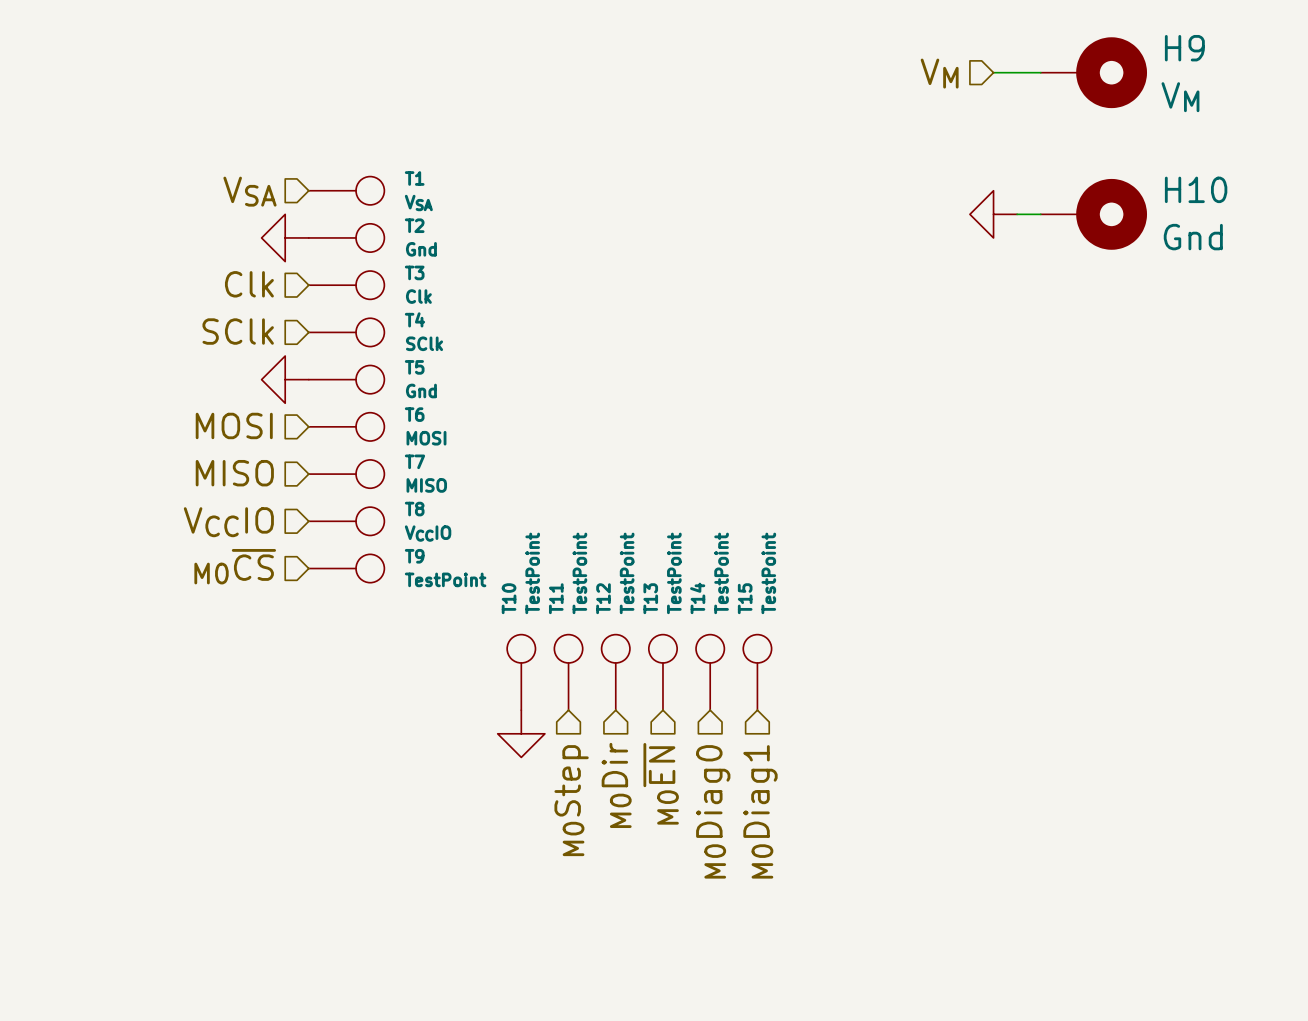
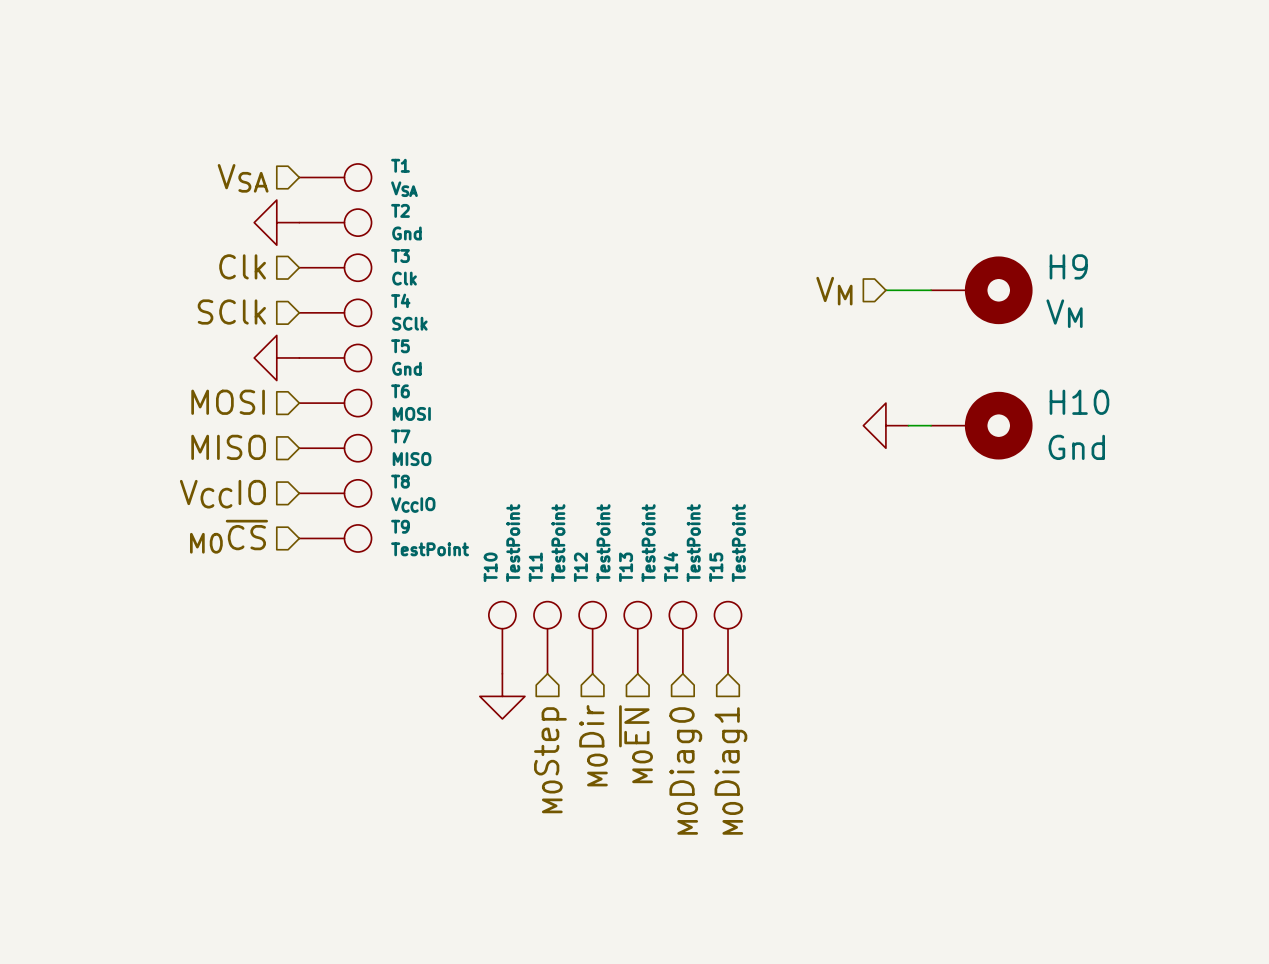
wire: (993, 72) (1040, 72) -> (885, 290) (931, 290)
H9 position: (1093, 72) -> (981, 290)
hierarchical label position: VM (939, 73) -> VM (834, 291)
power symbol position: (993, 214) -> (885, 425)
wire: (1017, 214) (1040, 214) -> (908, 425) (931, 425)
H10 position: (1093, 214) -> (981, 425)

